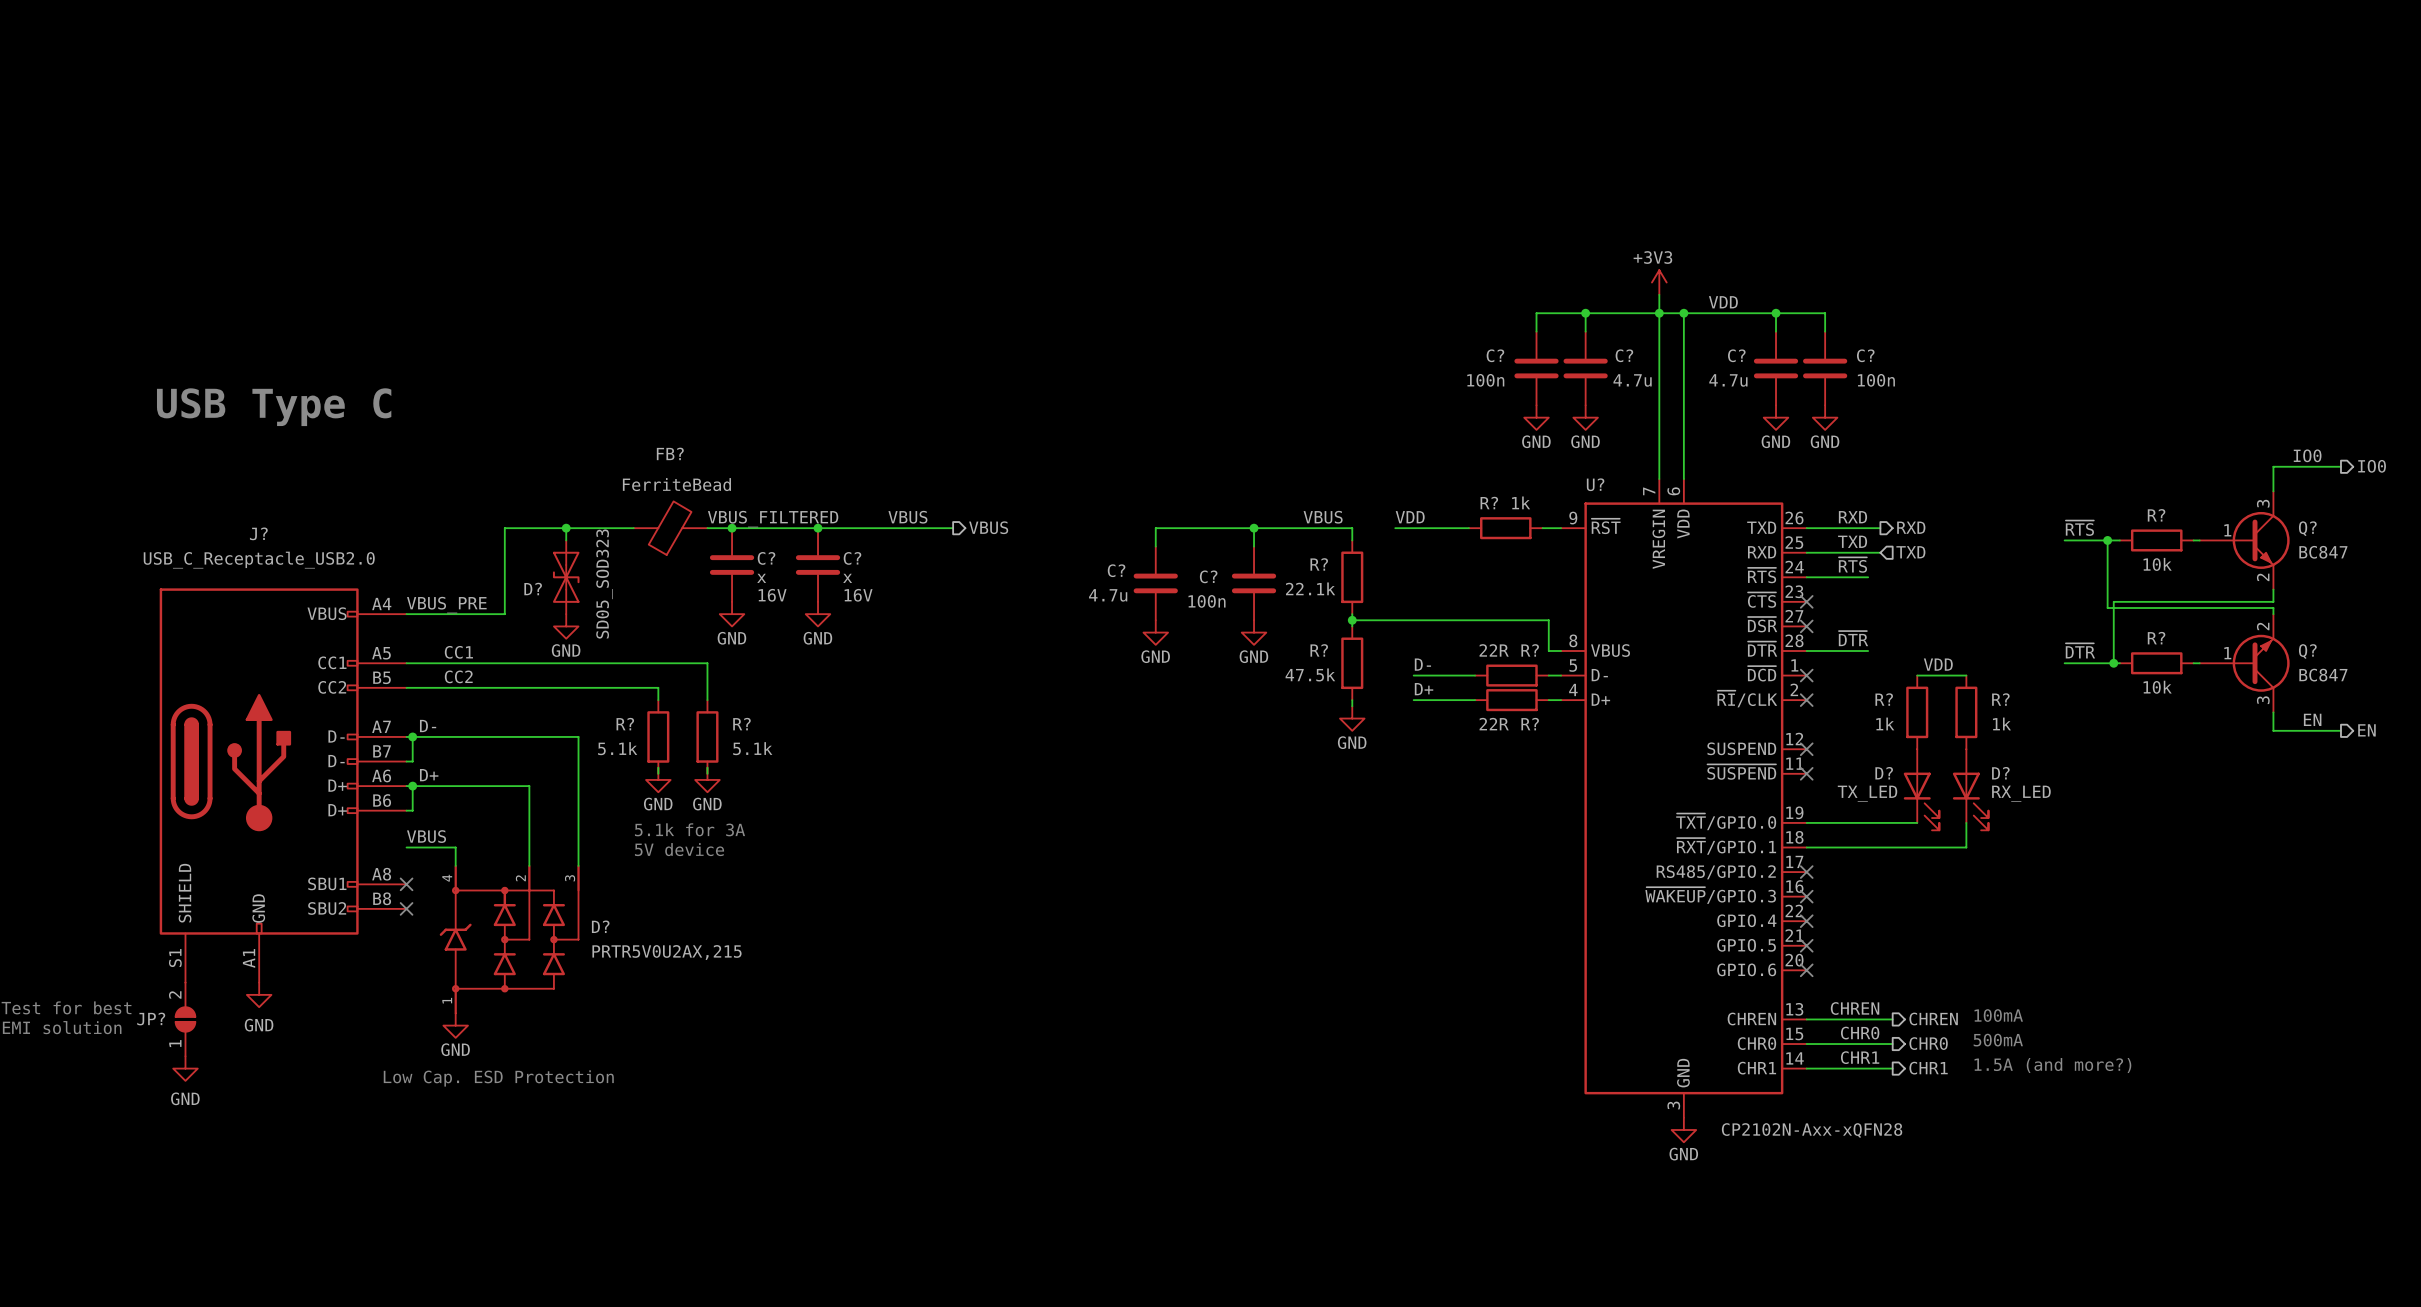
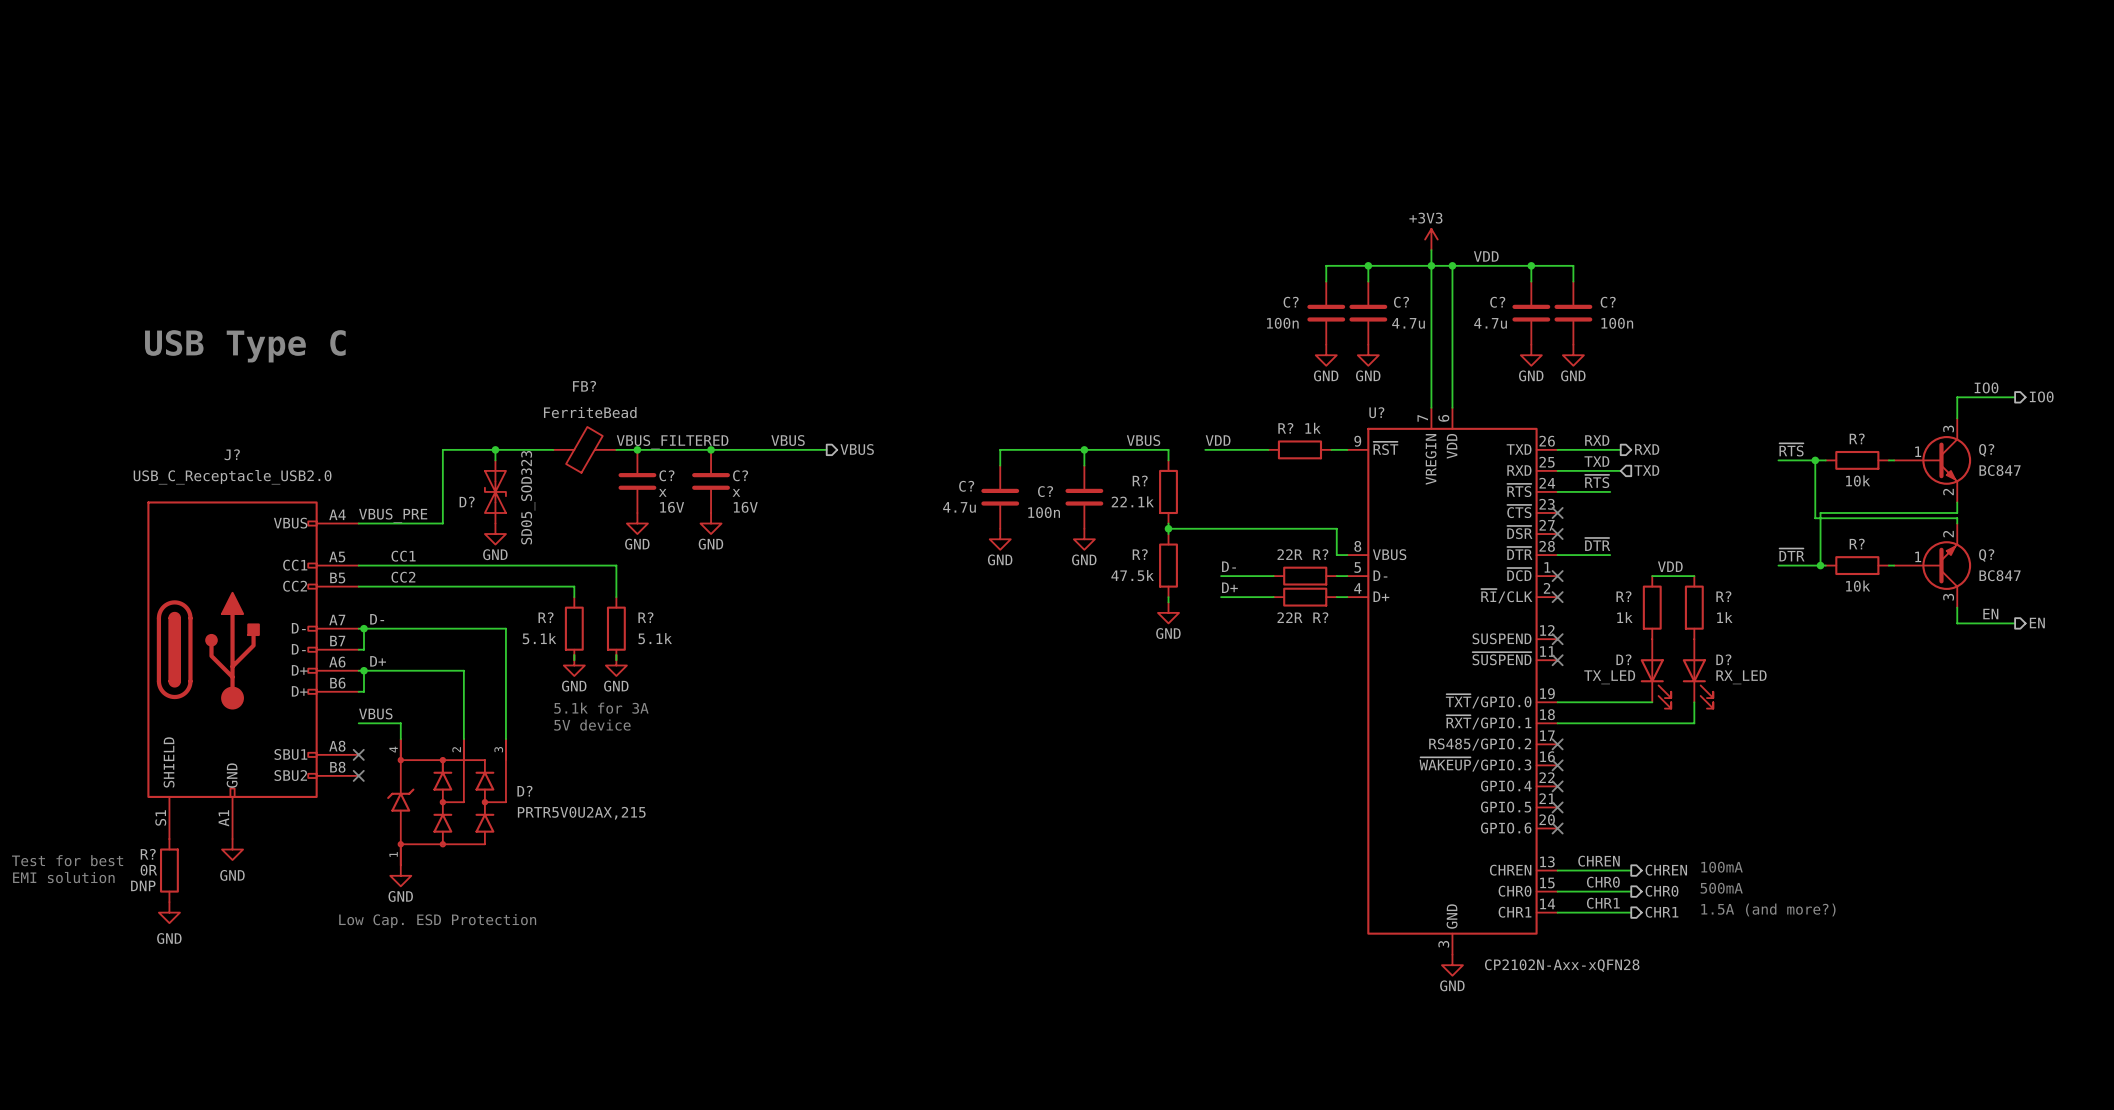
JP?: (185, 1019) -> none
R?: none -> 0R (169, 870)

